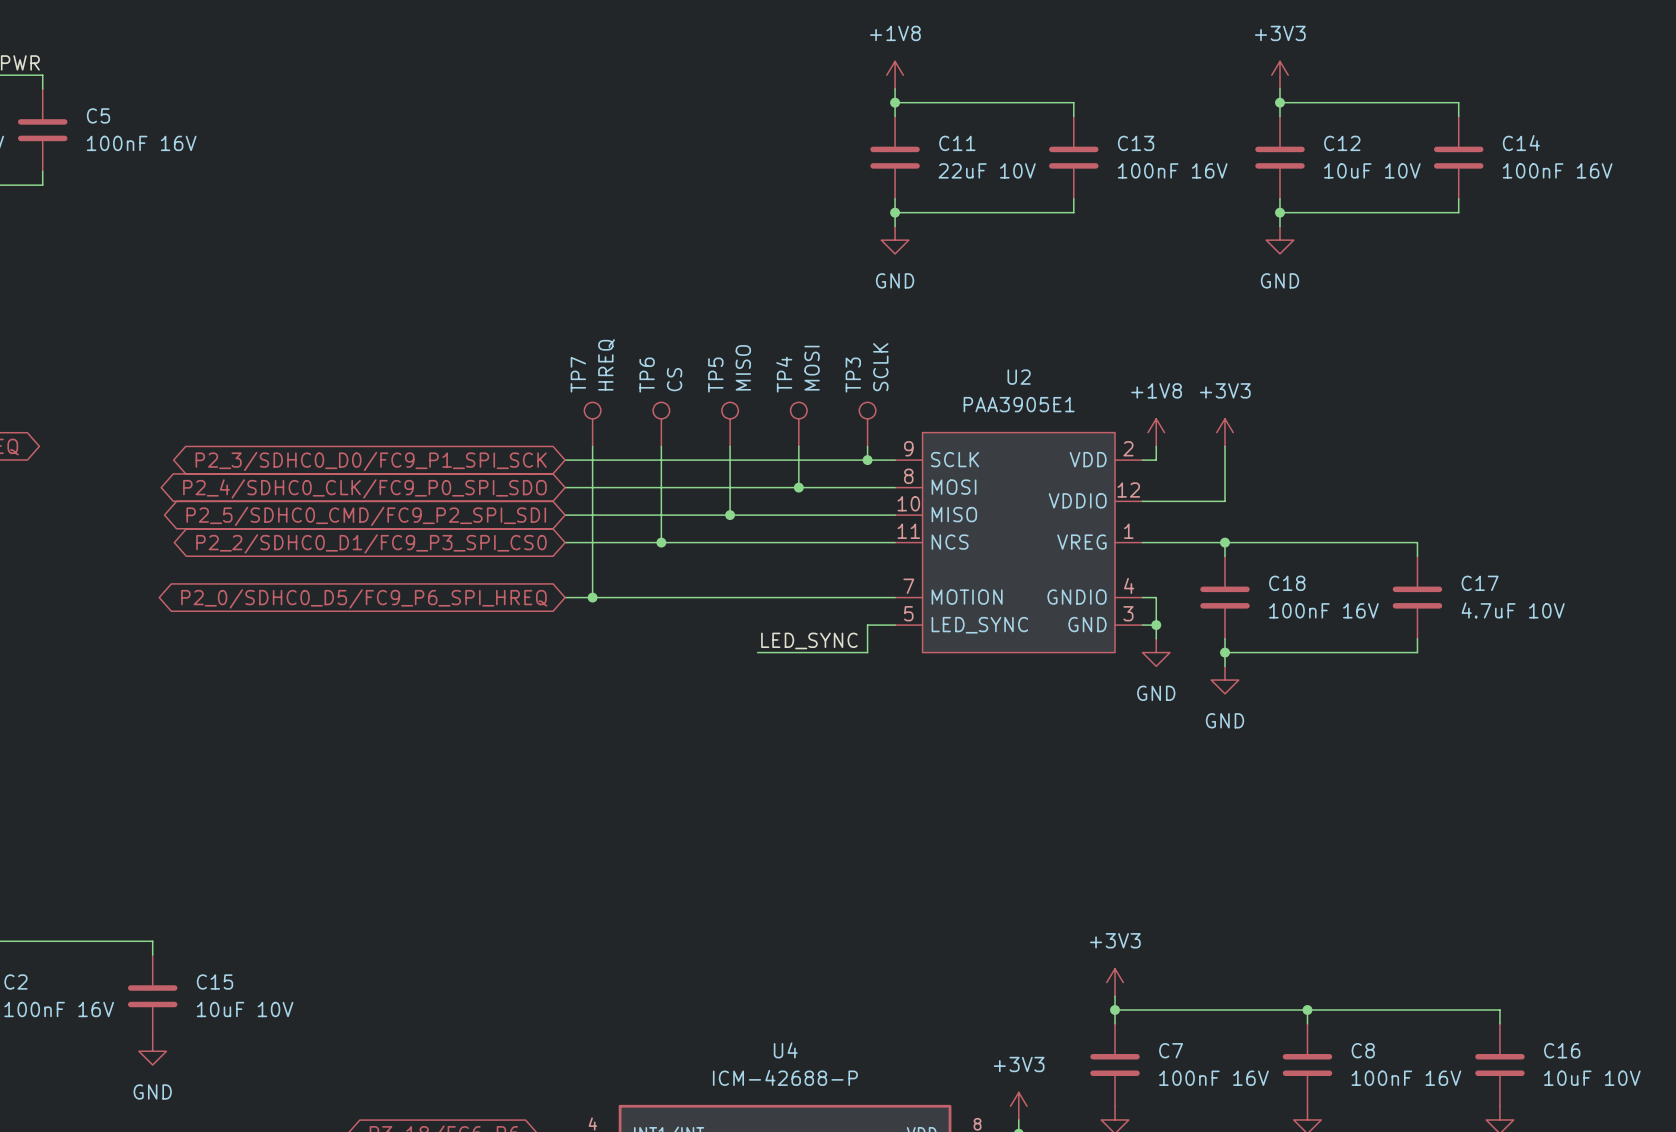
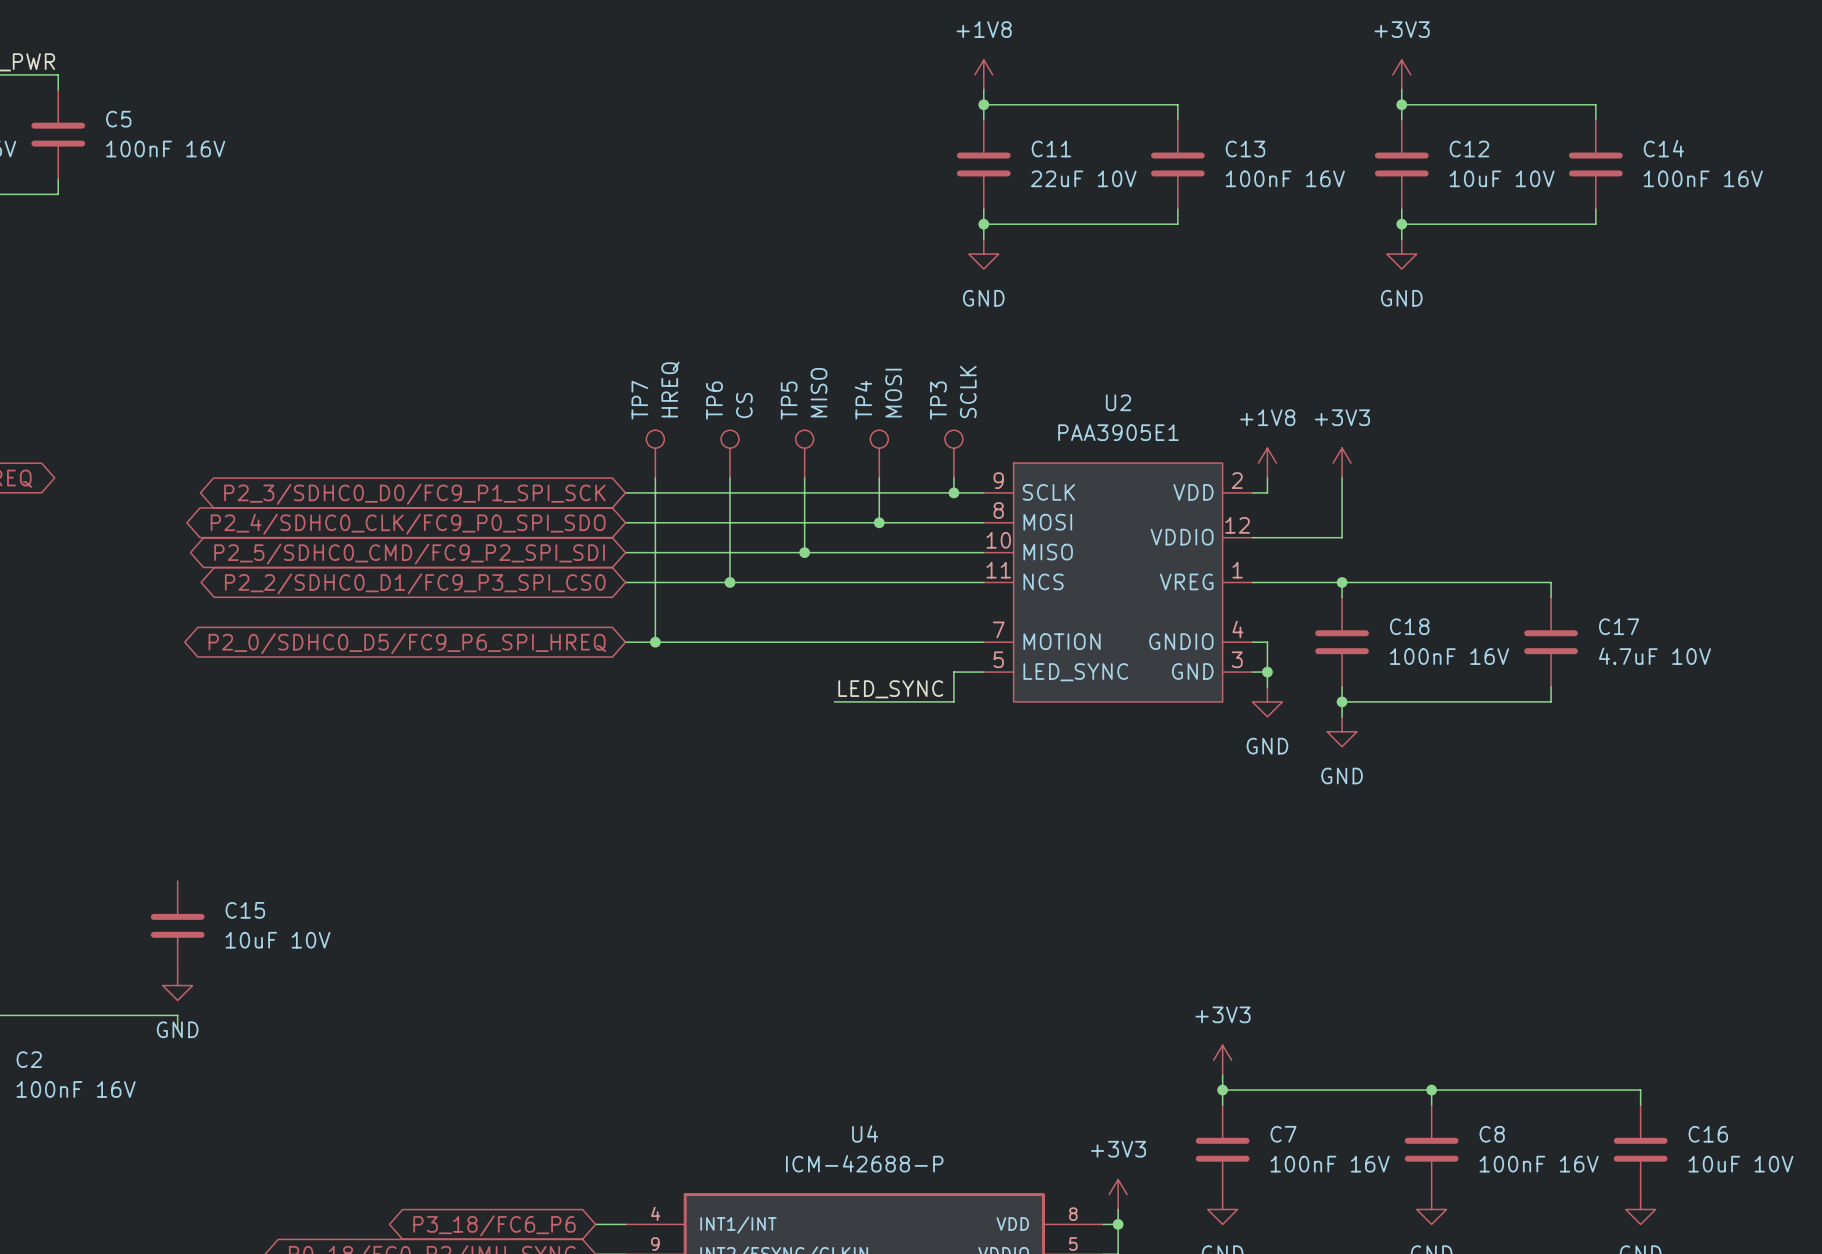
power symbol: none -> GND (177, 985)
C15 position: (152, 996) -> (177, 925)
power symbol: GND (152, 1051) -> none

